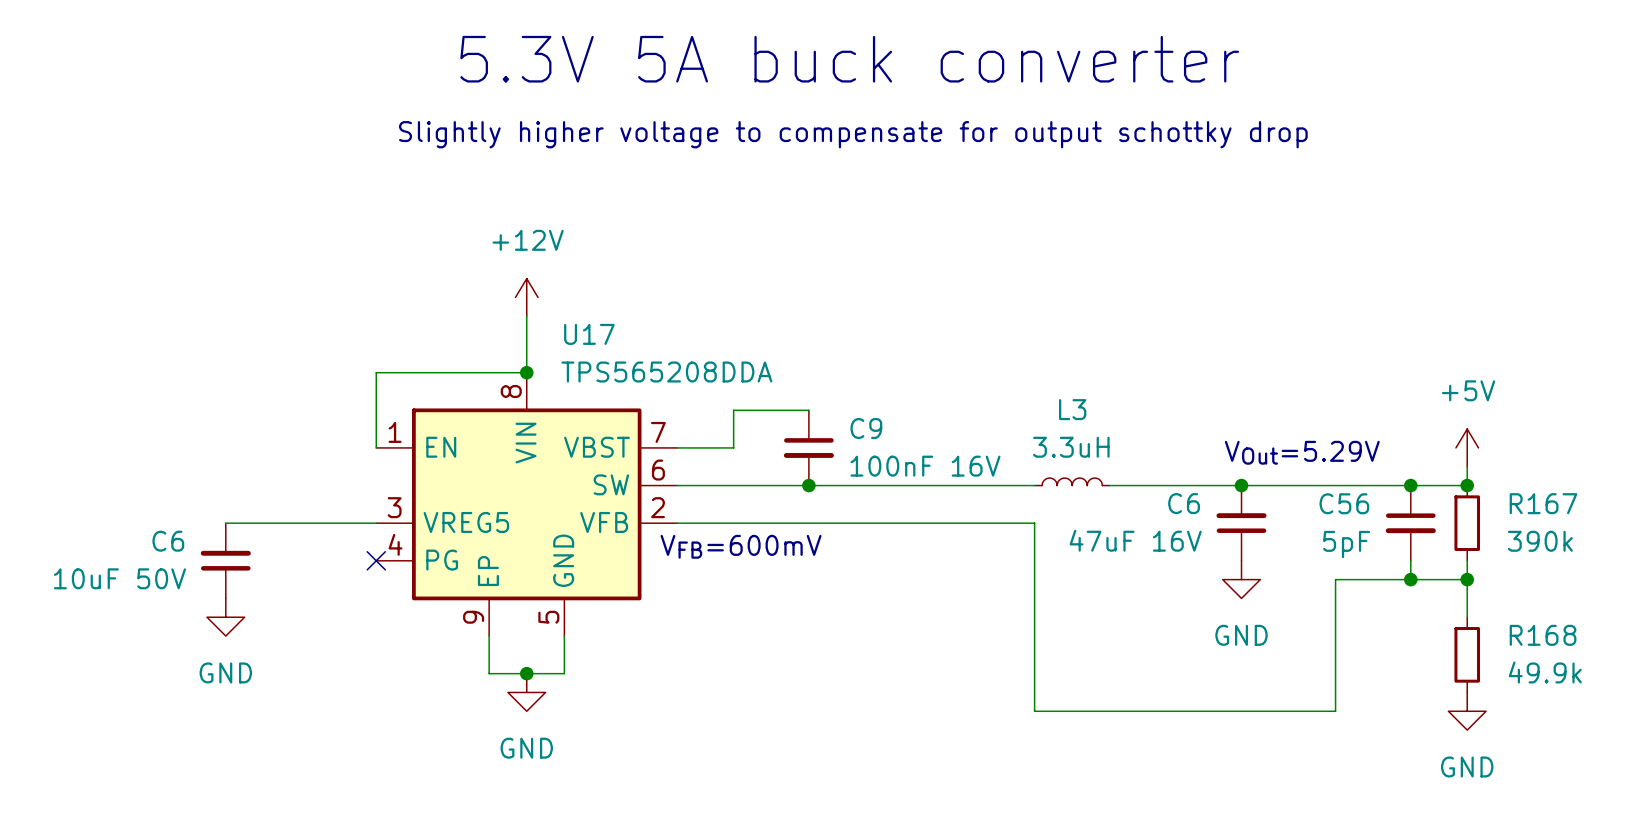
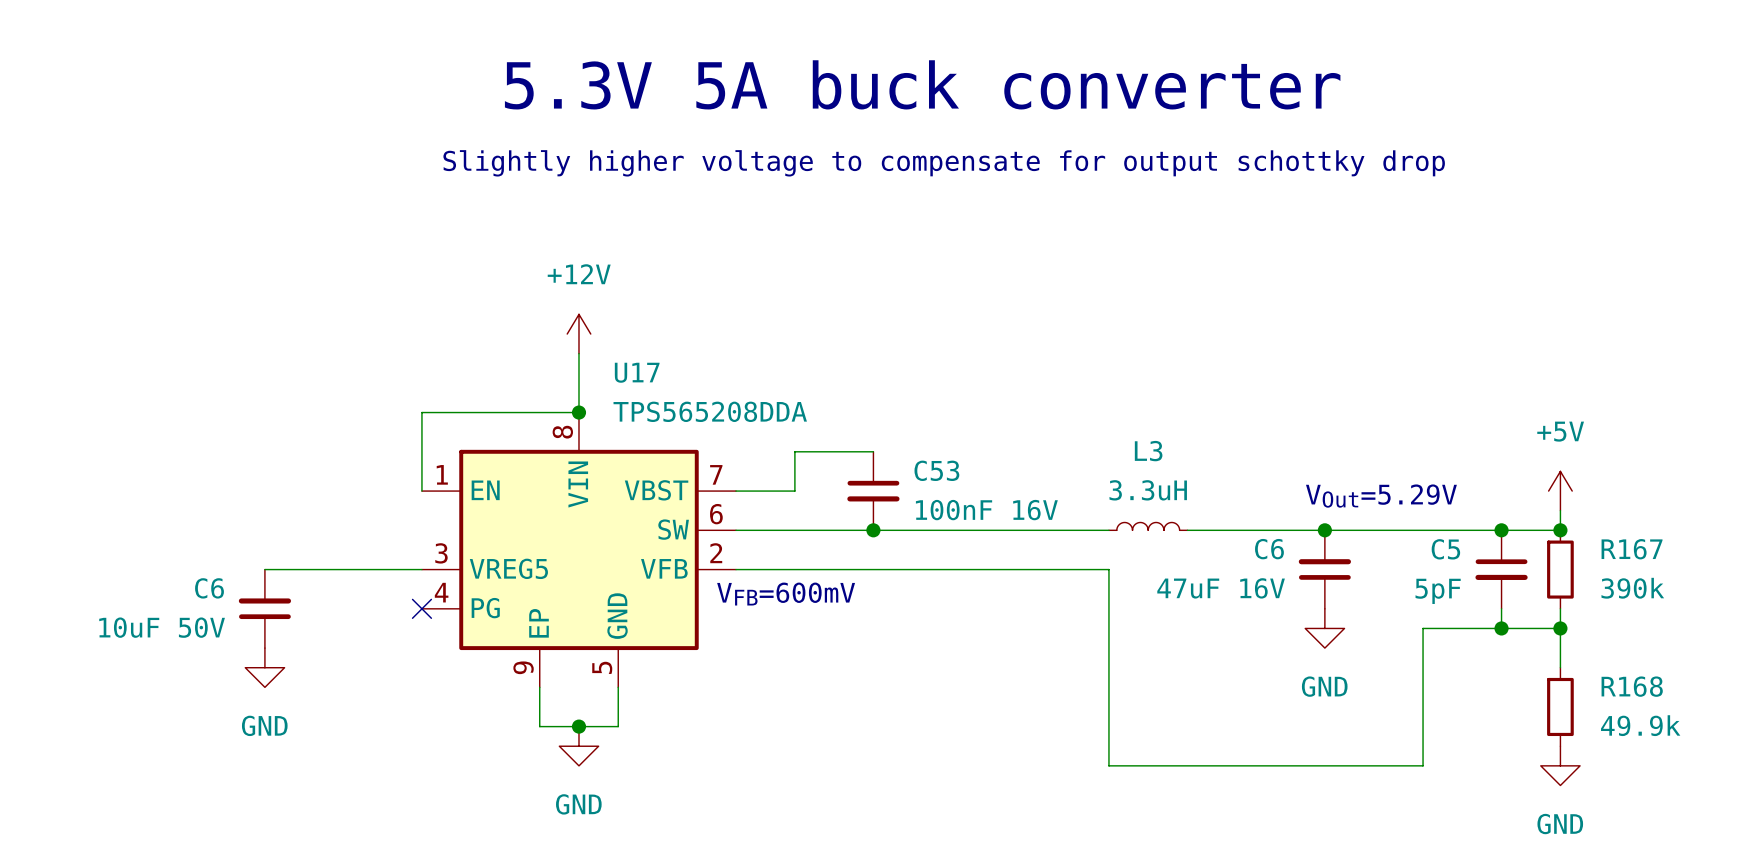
C9 name: C9 (866, 428) -> C53 (936, 470)
C56 name: C56 (1344, 503) -> C5 (1445, 549)

